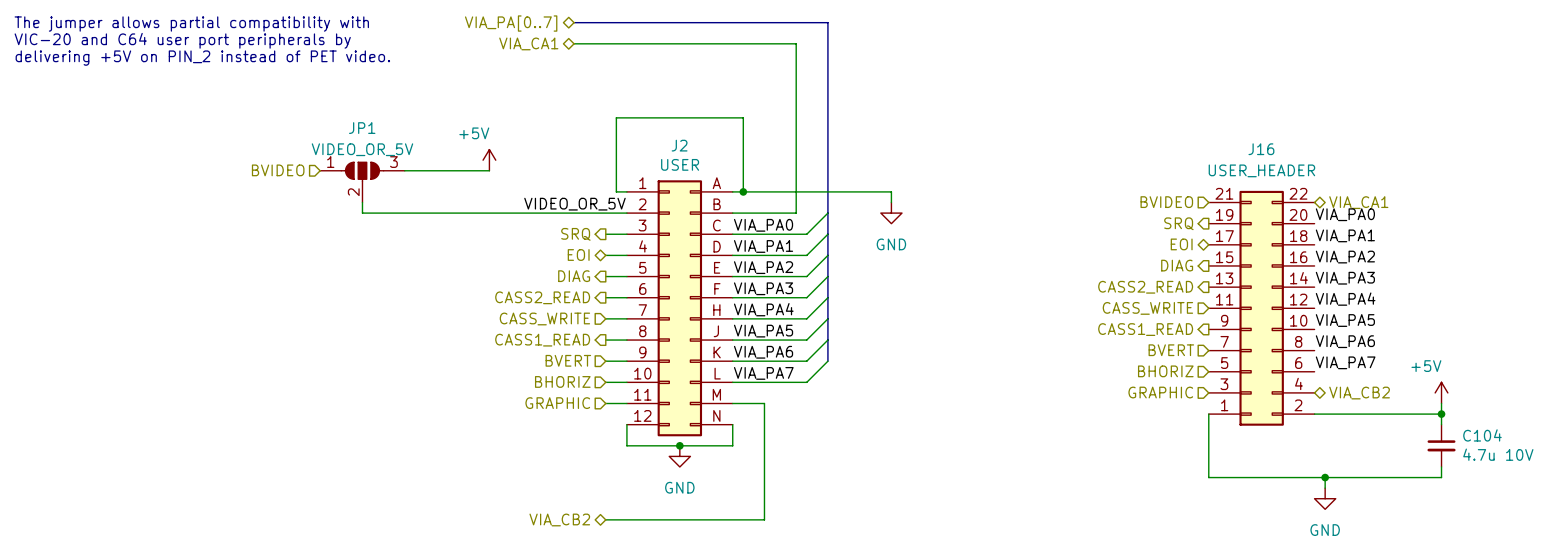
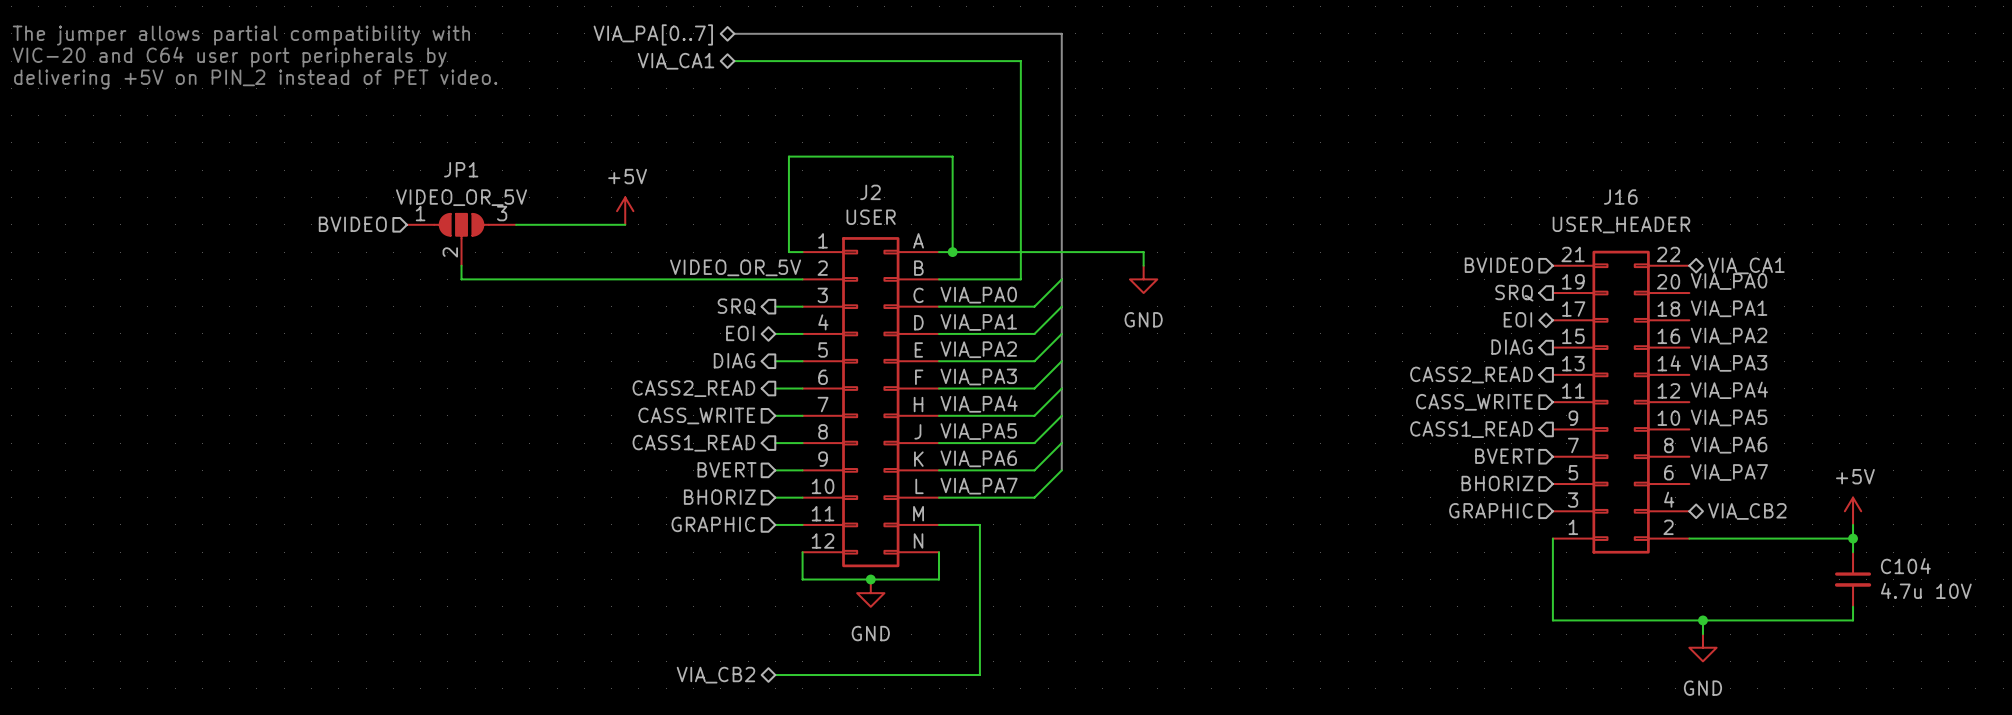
power symbol text position: +5V (474, 133) -> +5V (627, 176)
power symbol text position: +5V (1426, 366) -> +5V (1855, 476)

